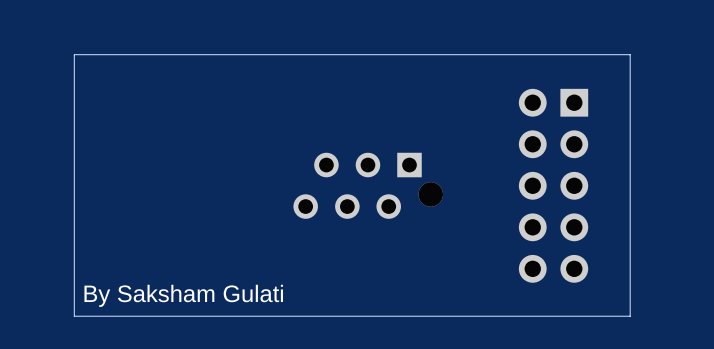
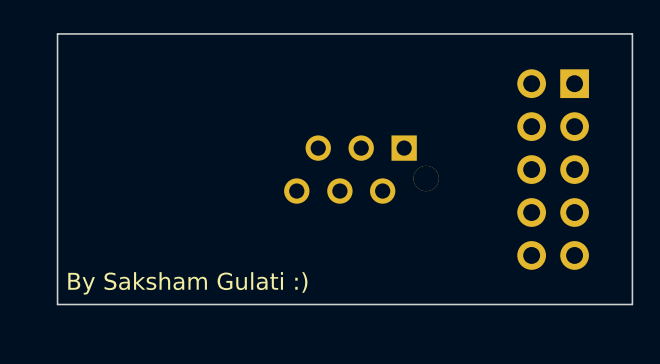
text: By Saksham Gulati (183, 295) -> By Saksham Gulati :) (187, 283)

